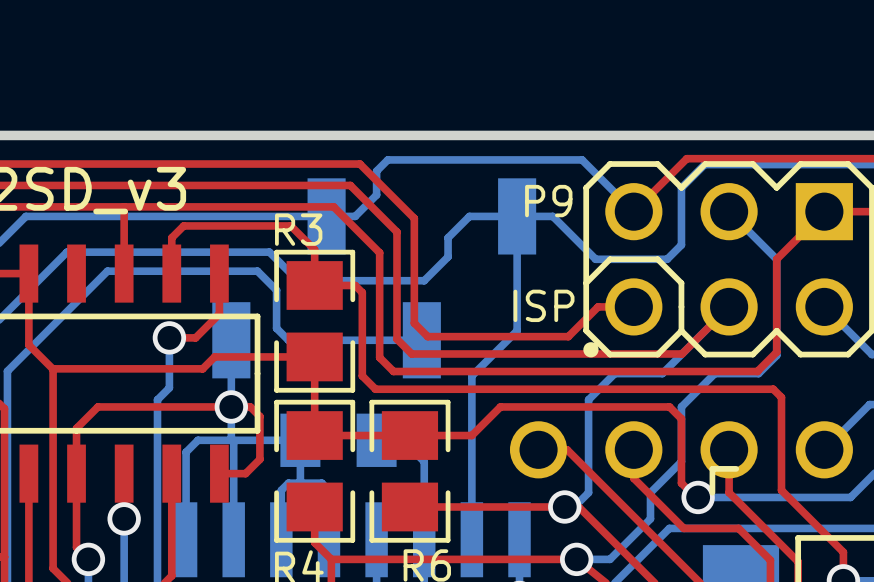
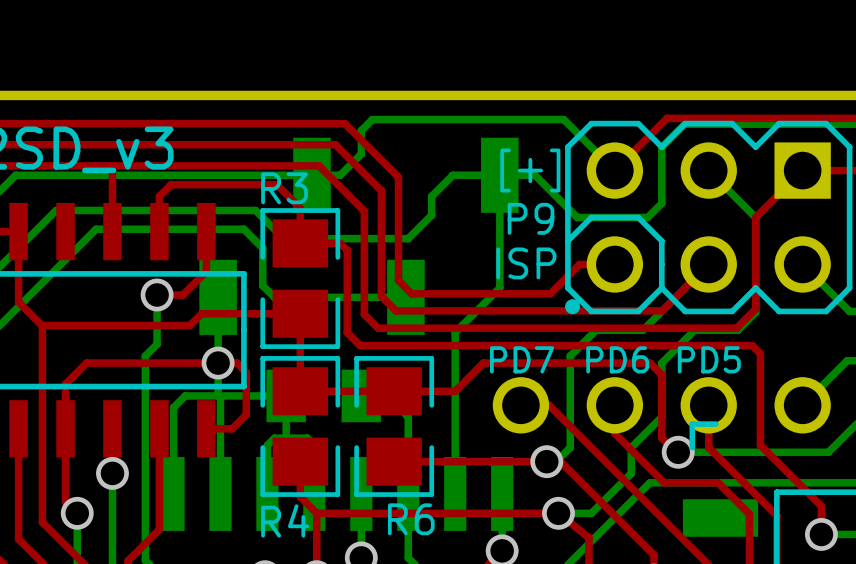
P9 name position: P9 (548, 201) -> P9 (531, 218)
text: none -> [+] (530, 170)
text: none -> PD7 (522, 359)
text: none -> PD6 (617, 359)
text: none -> PD5 (709, 359)

